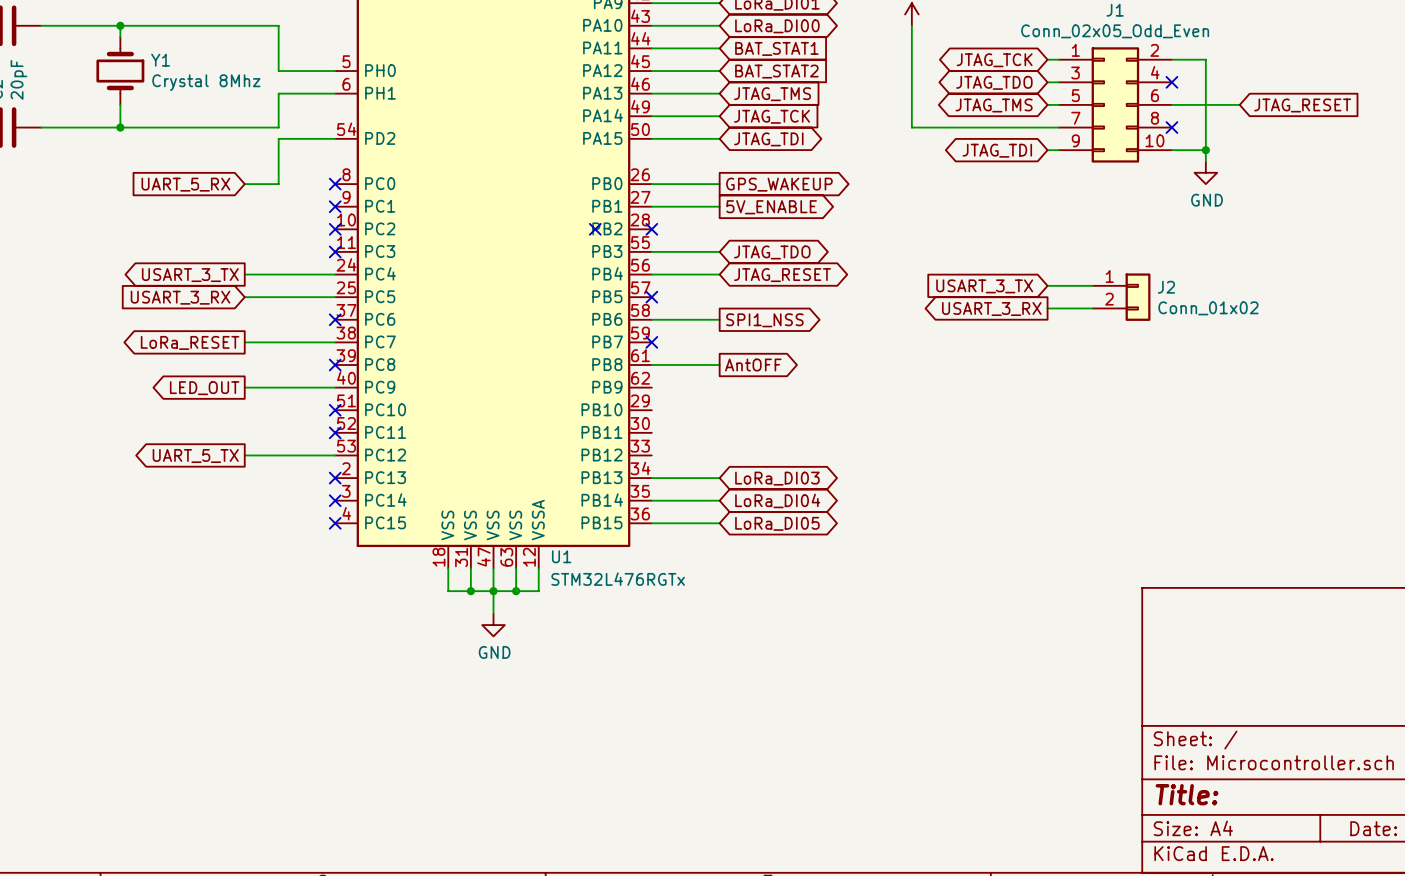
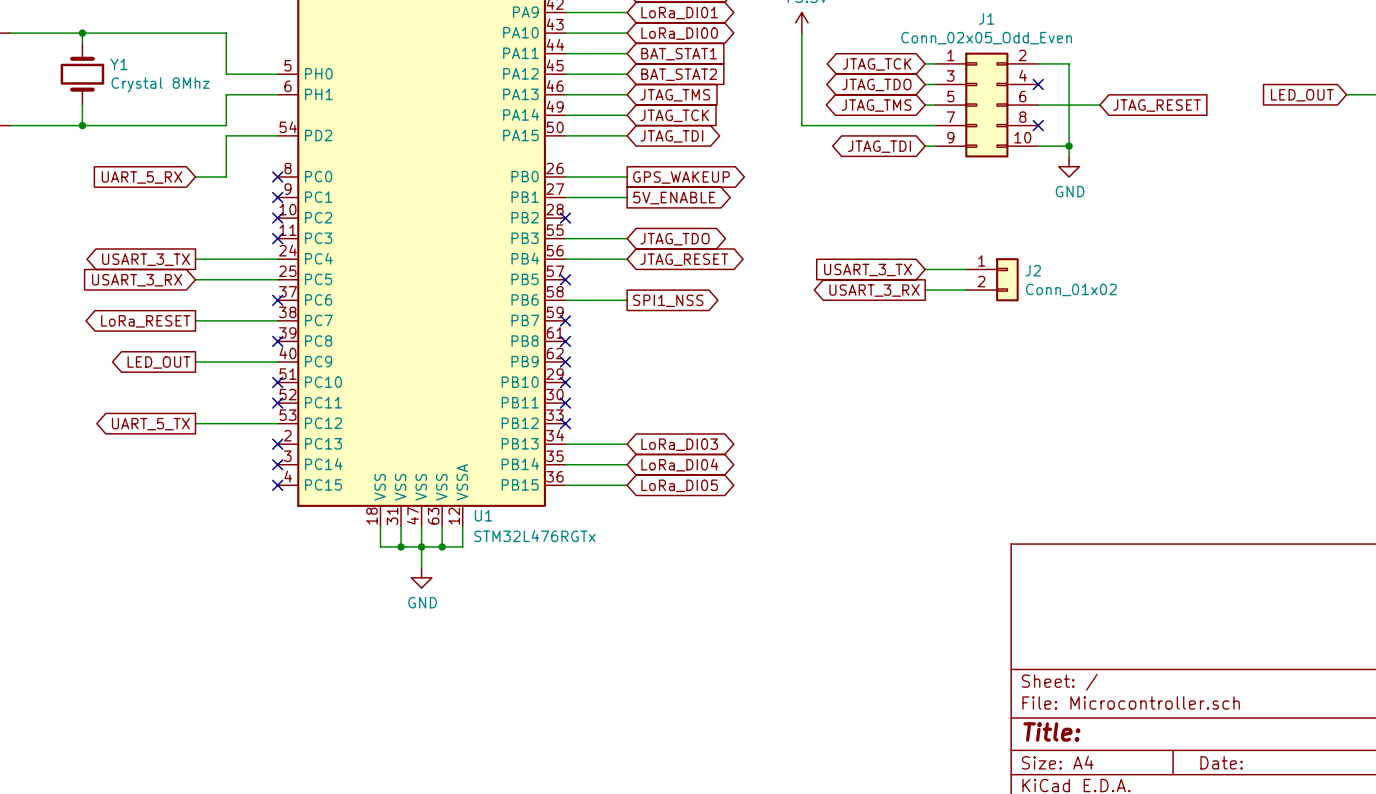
no-connect mark: (595, 229) -> none
wire: (651, 365) (719, 365) -> none
no-connect mark: none -> (565, 341)
global label: AntOFF (753, 365) -> none
no-connect mark: none -> (565, 361)
no-connect mark: none -> (565, 382)
no-connect mark: none -> (565, 403)
no-connect mark: none -> (565, 423)

